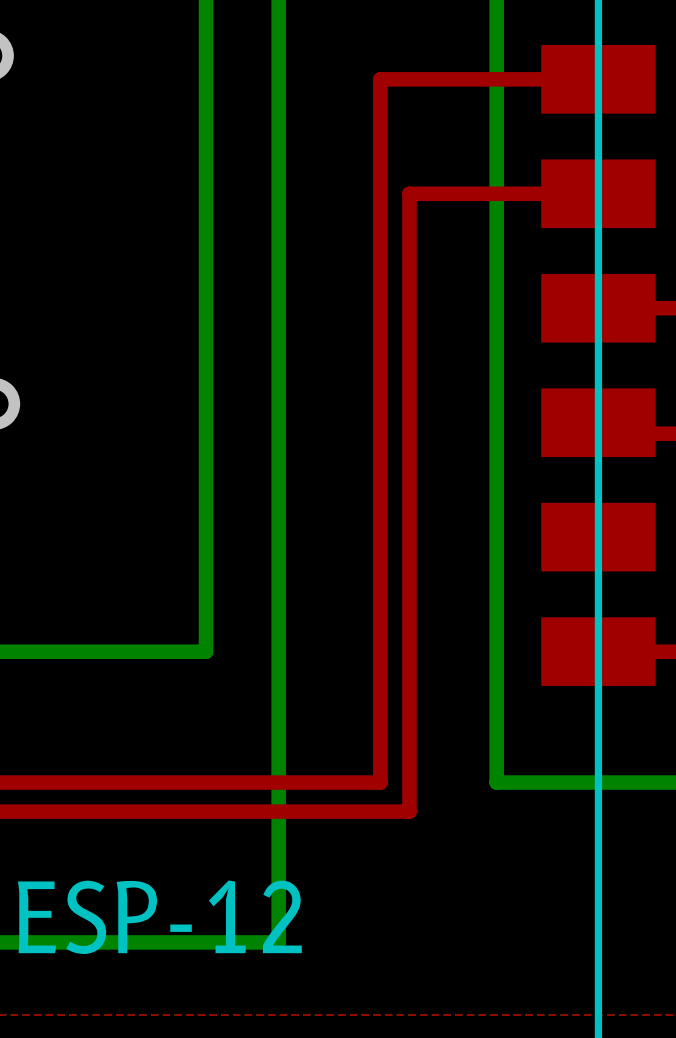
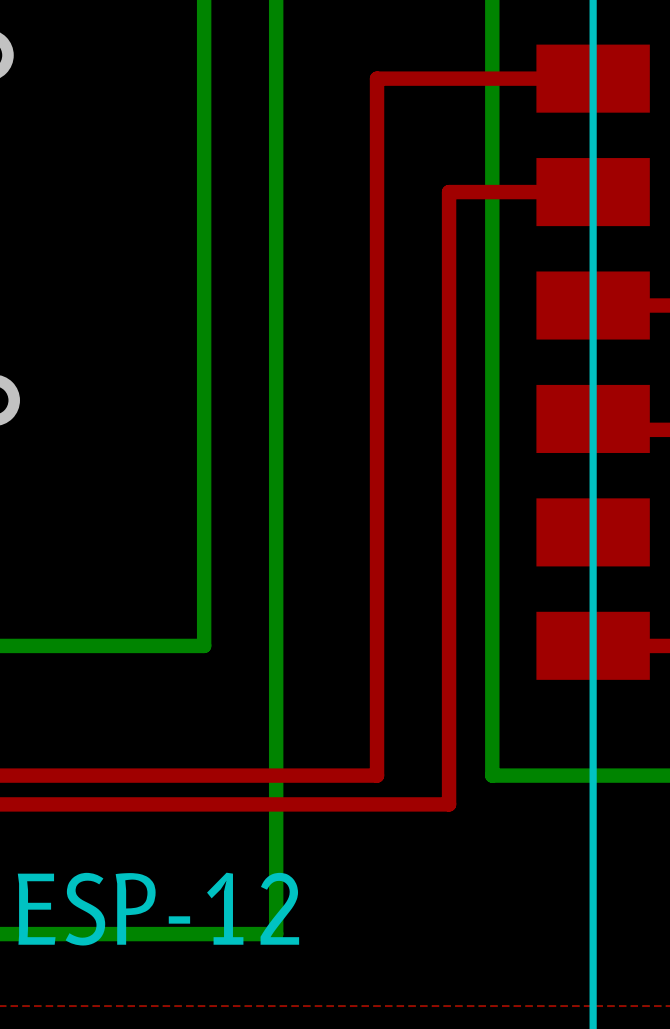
top track: (453, 193) (409, 193) (409, 811) -> (449, 192) (449, 804) (405, 804)

